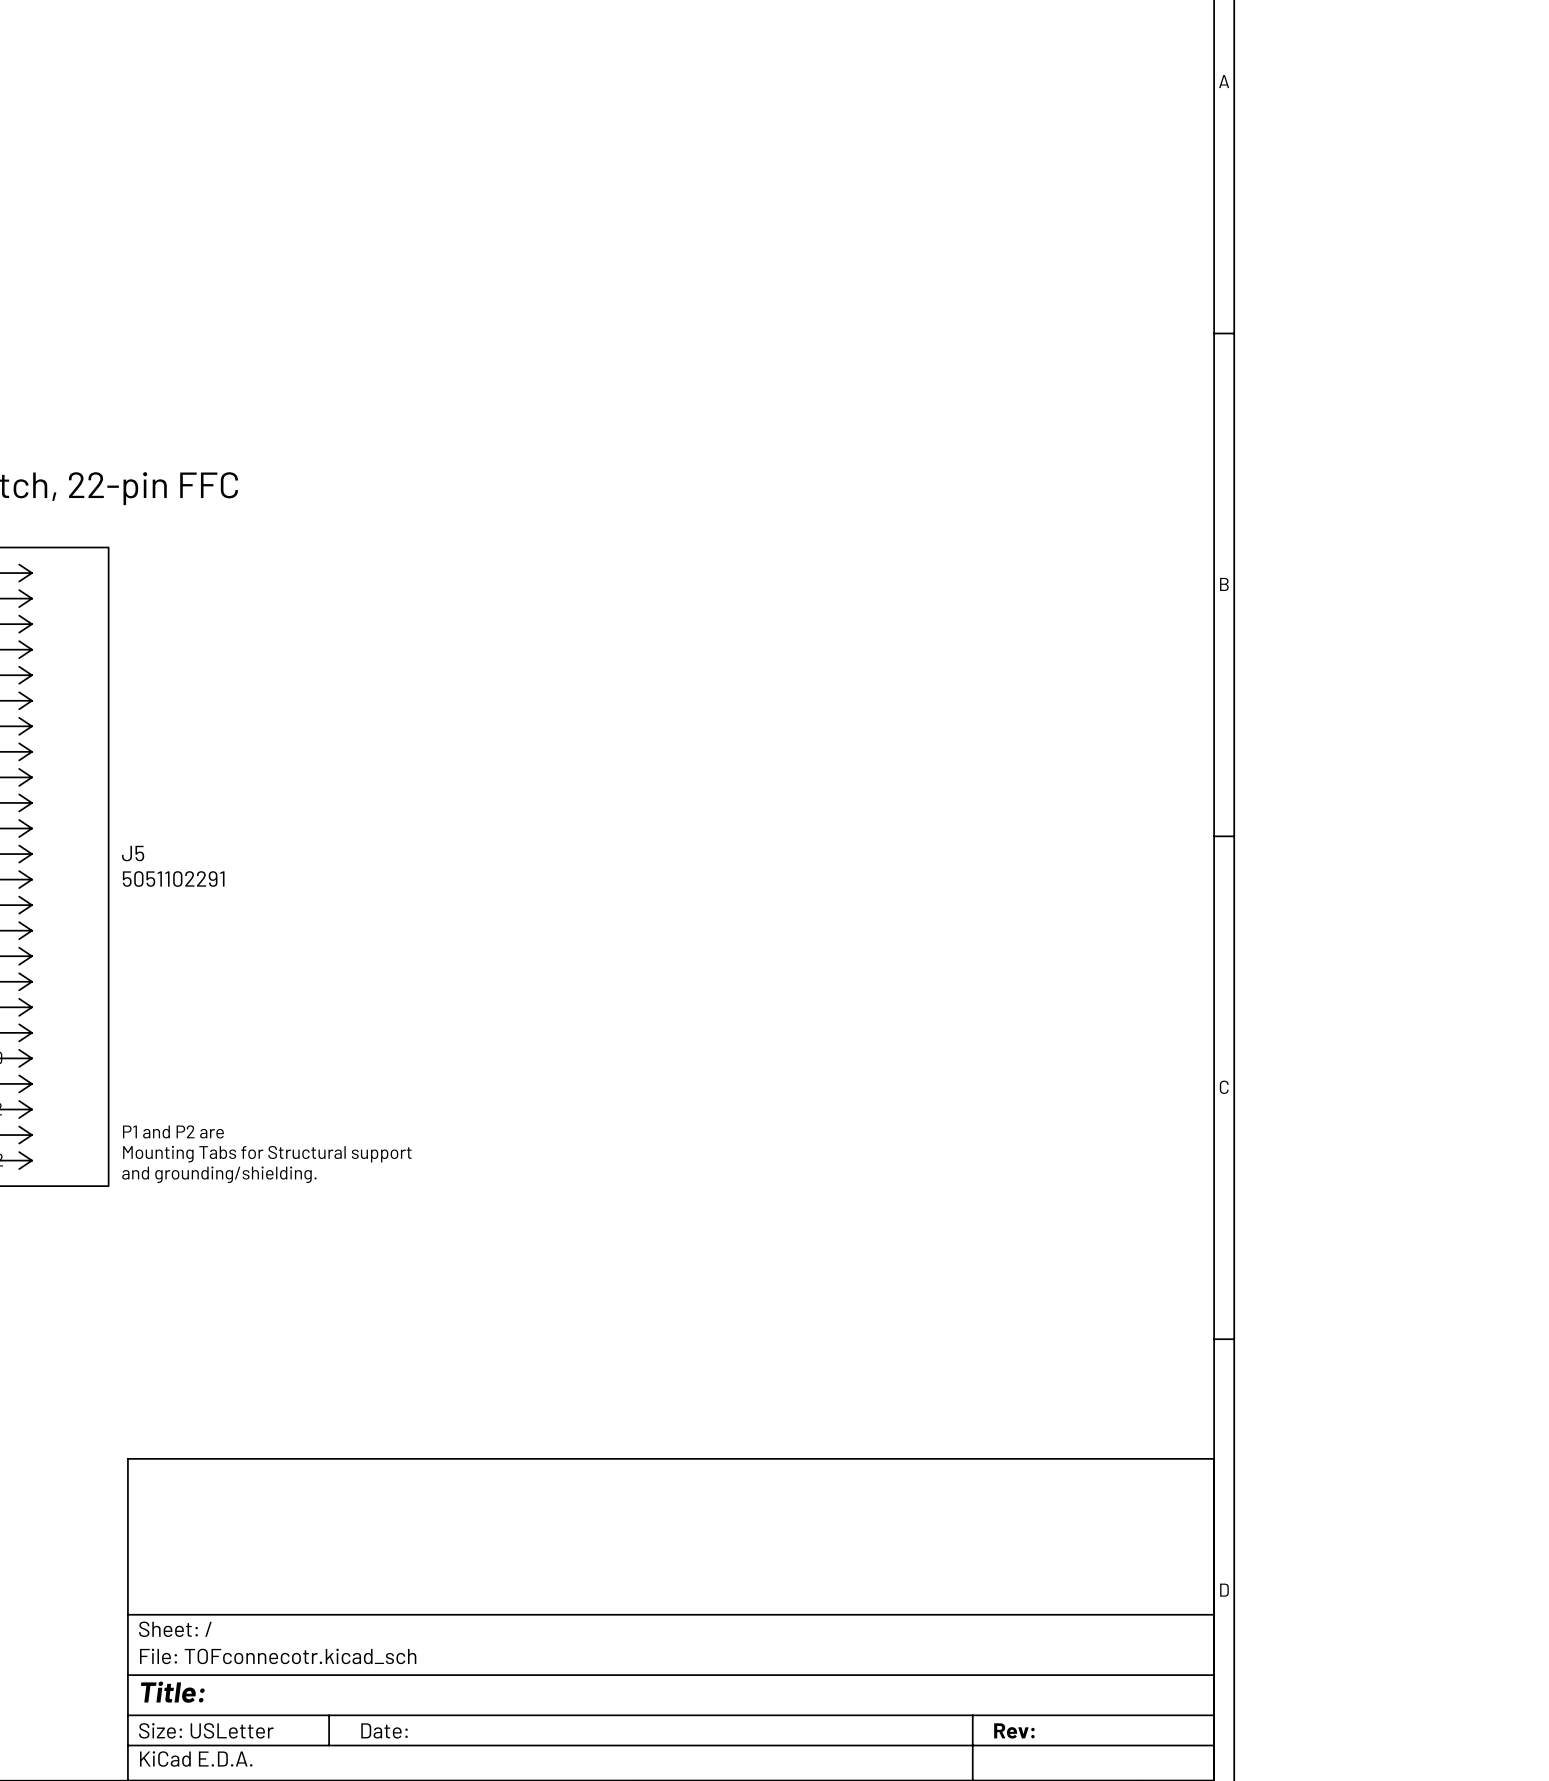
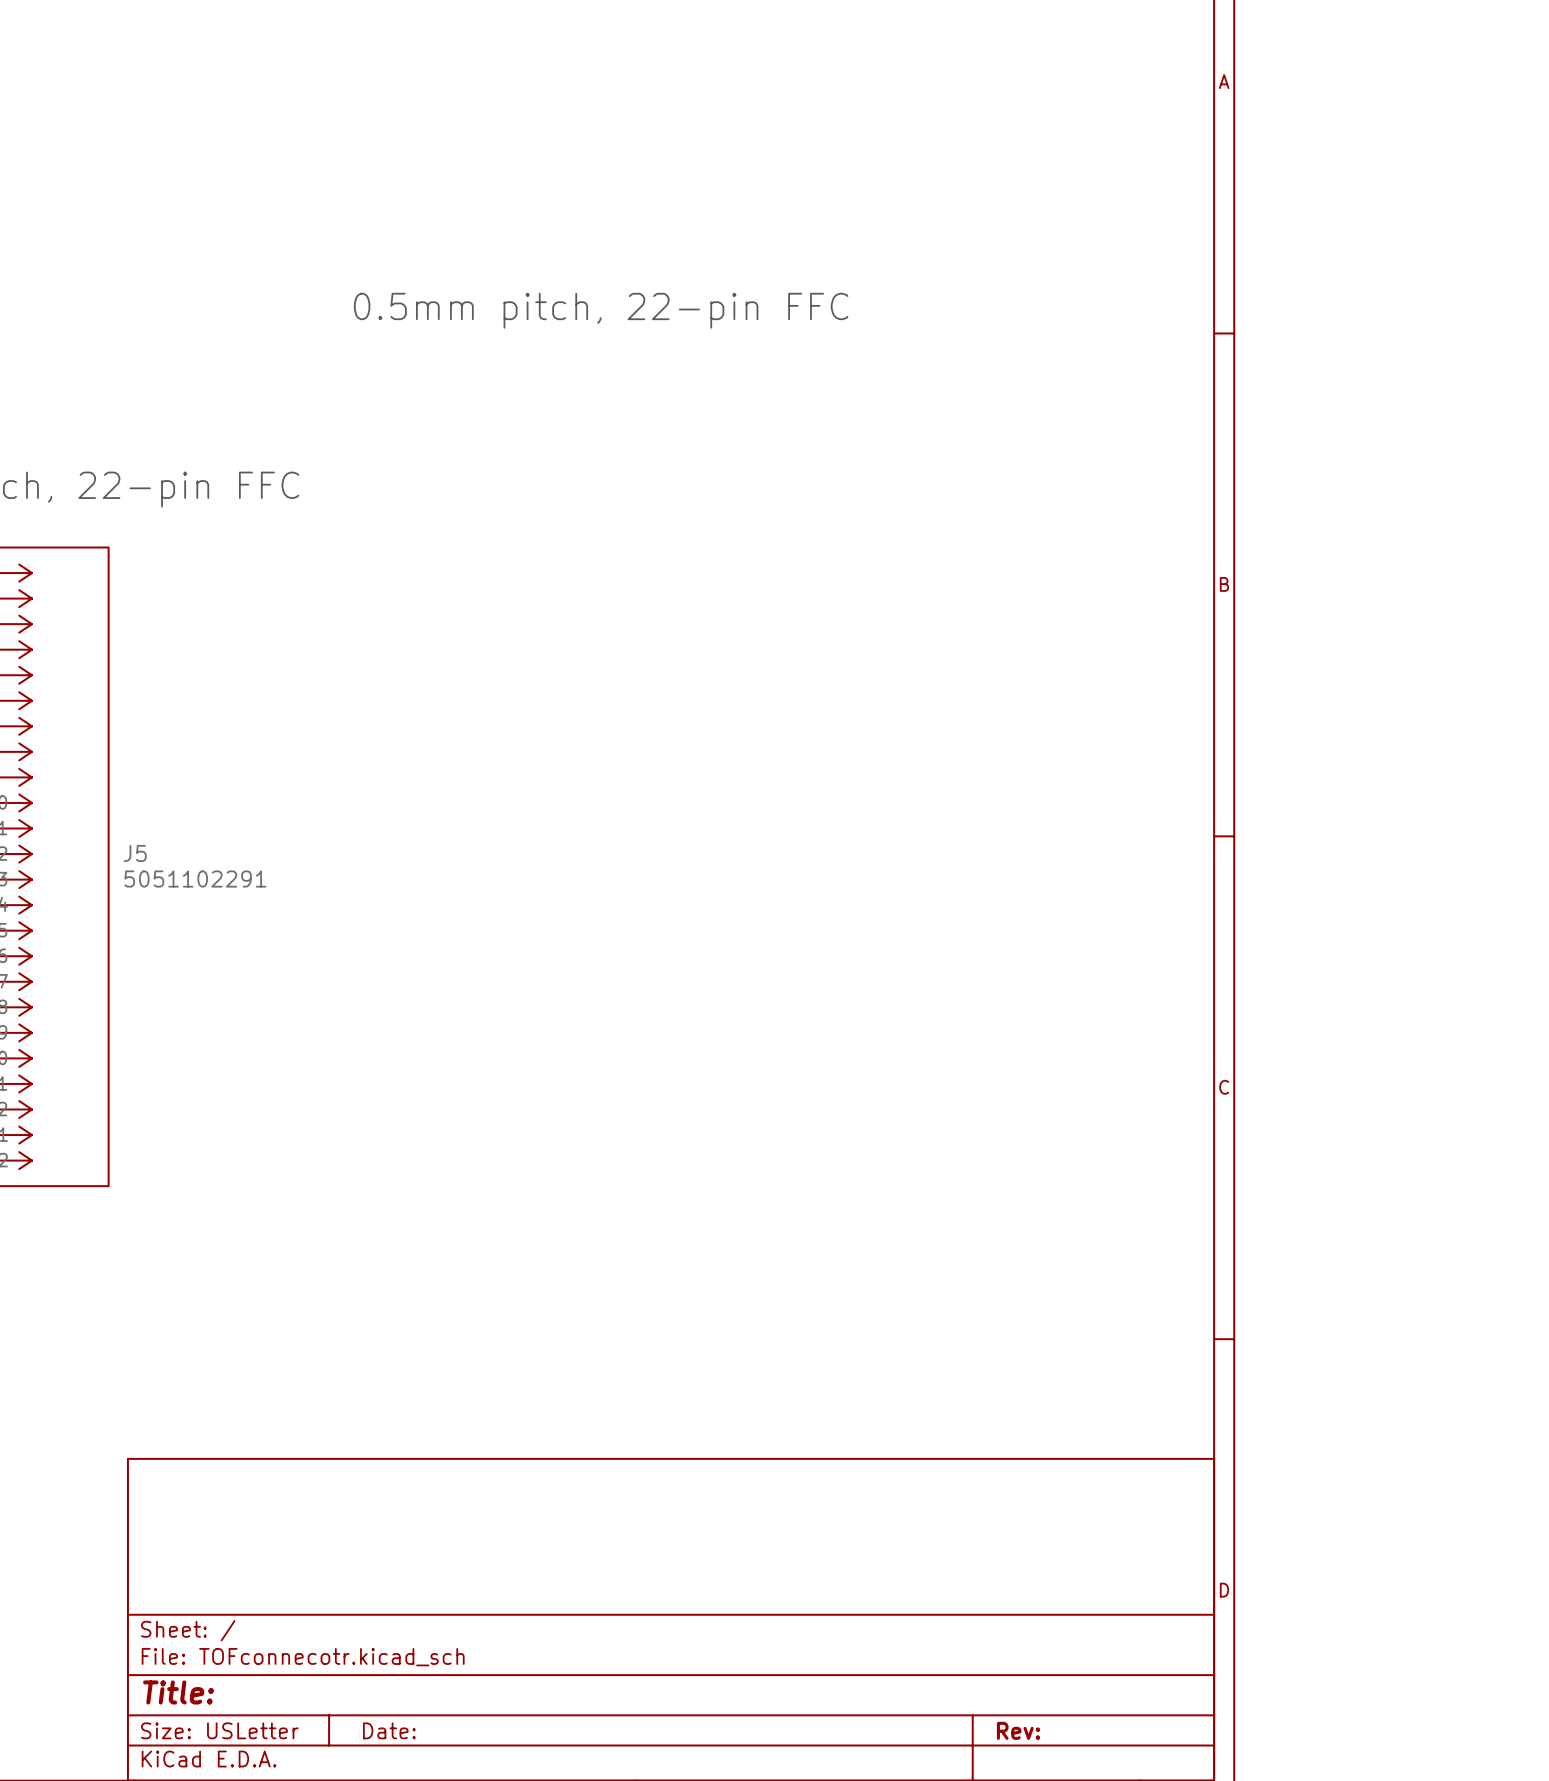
text: none -> 0.5mm pitch, 22-pin FFC (601, 310)
text: P1 and P2 are (173, 1131) -> none
text: Mounting Tabs for Structural support (267, 1154) -> none
text: and grounding/shielding. (219, 1174) -> none

